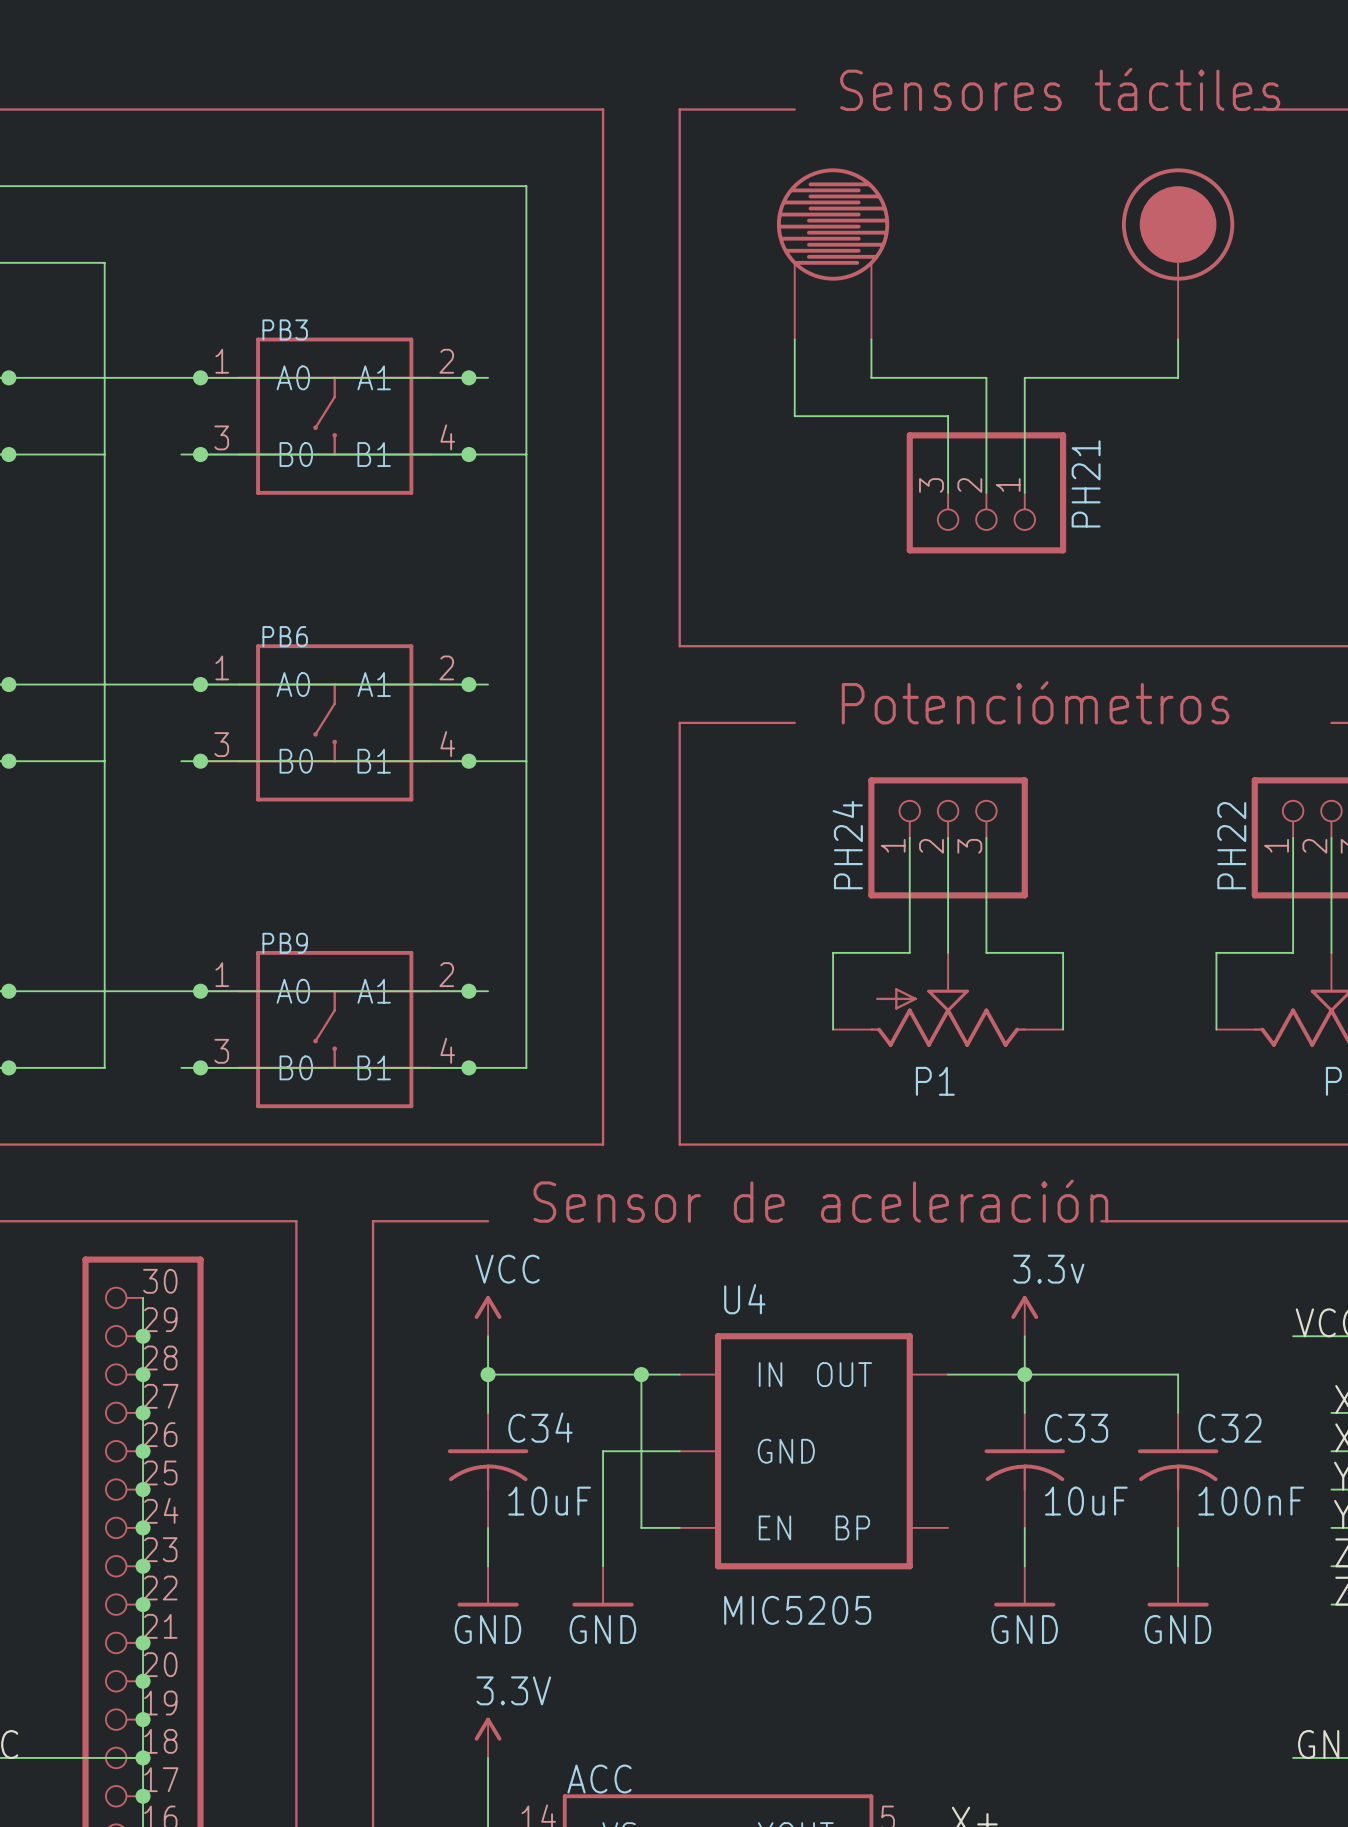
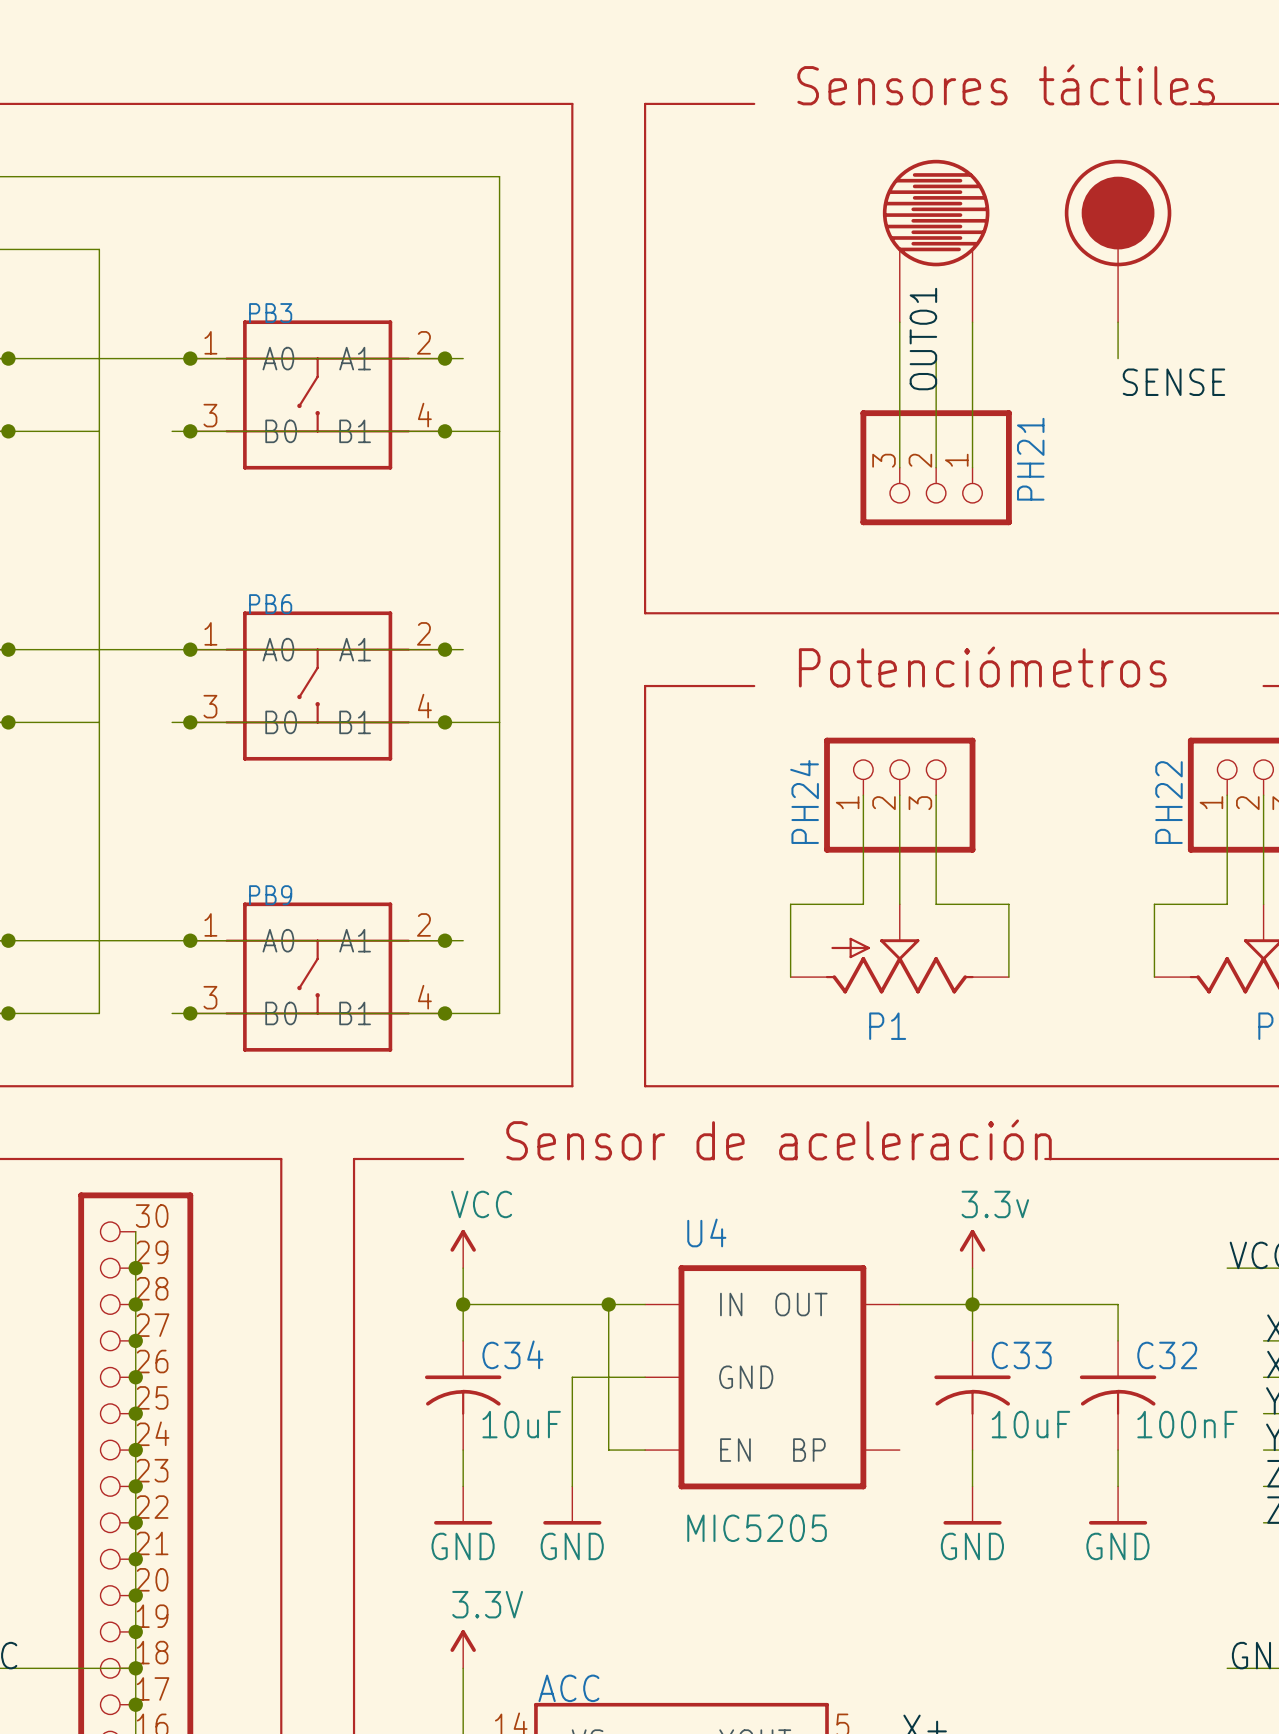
part position: (833, 253) -> (936, 241)
wire: (794, 339) (794, 416) (948, 416) -> (899, 322) (899, 394)
wire: (871, 339) (871, 377) (986, 377) -> none
label: none -> OUT01 (923, 339)
wire: (1024, 377) (1178, 377) -> (972, 358) (972, 322)
label: none -> SENSE (1173, 382)

